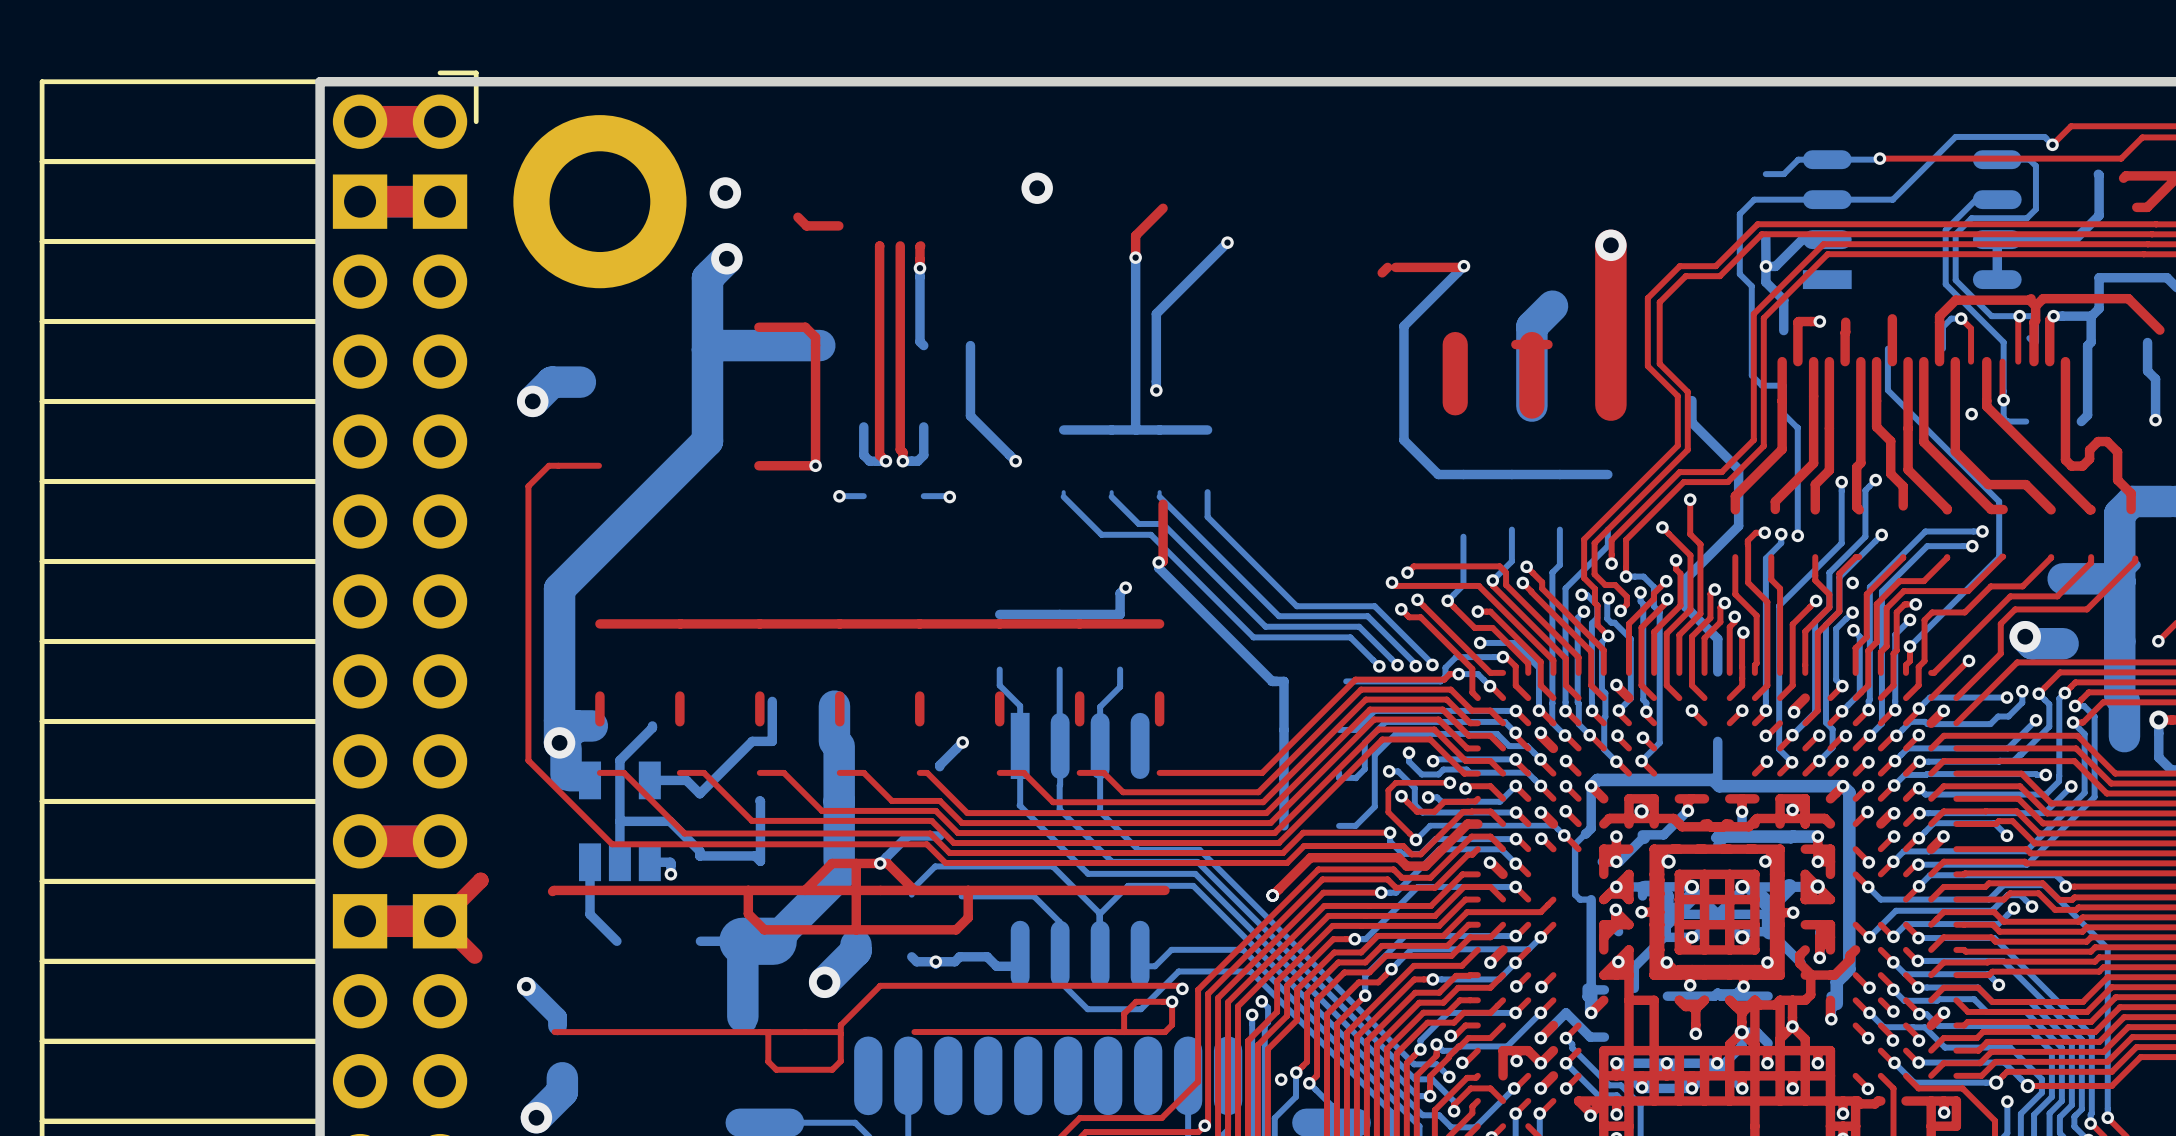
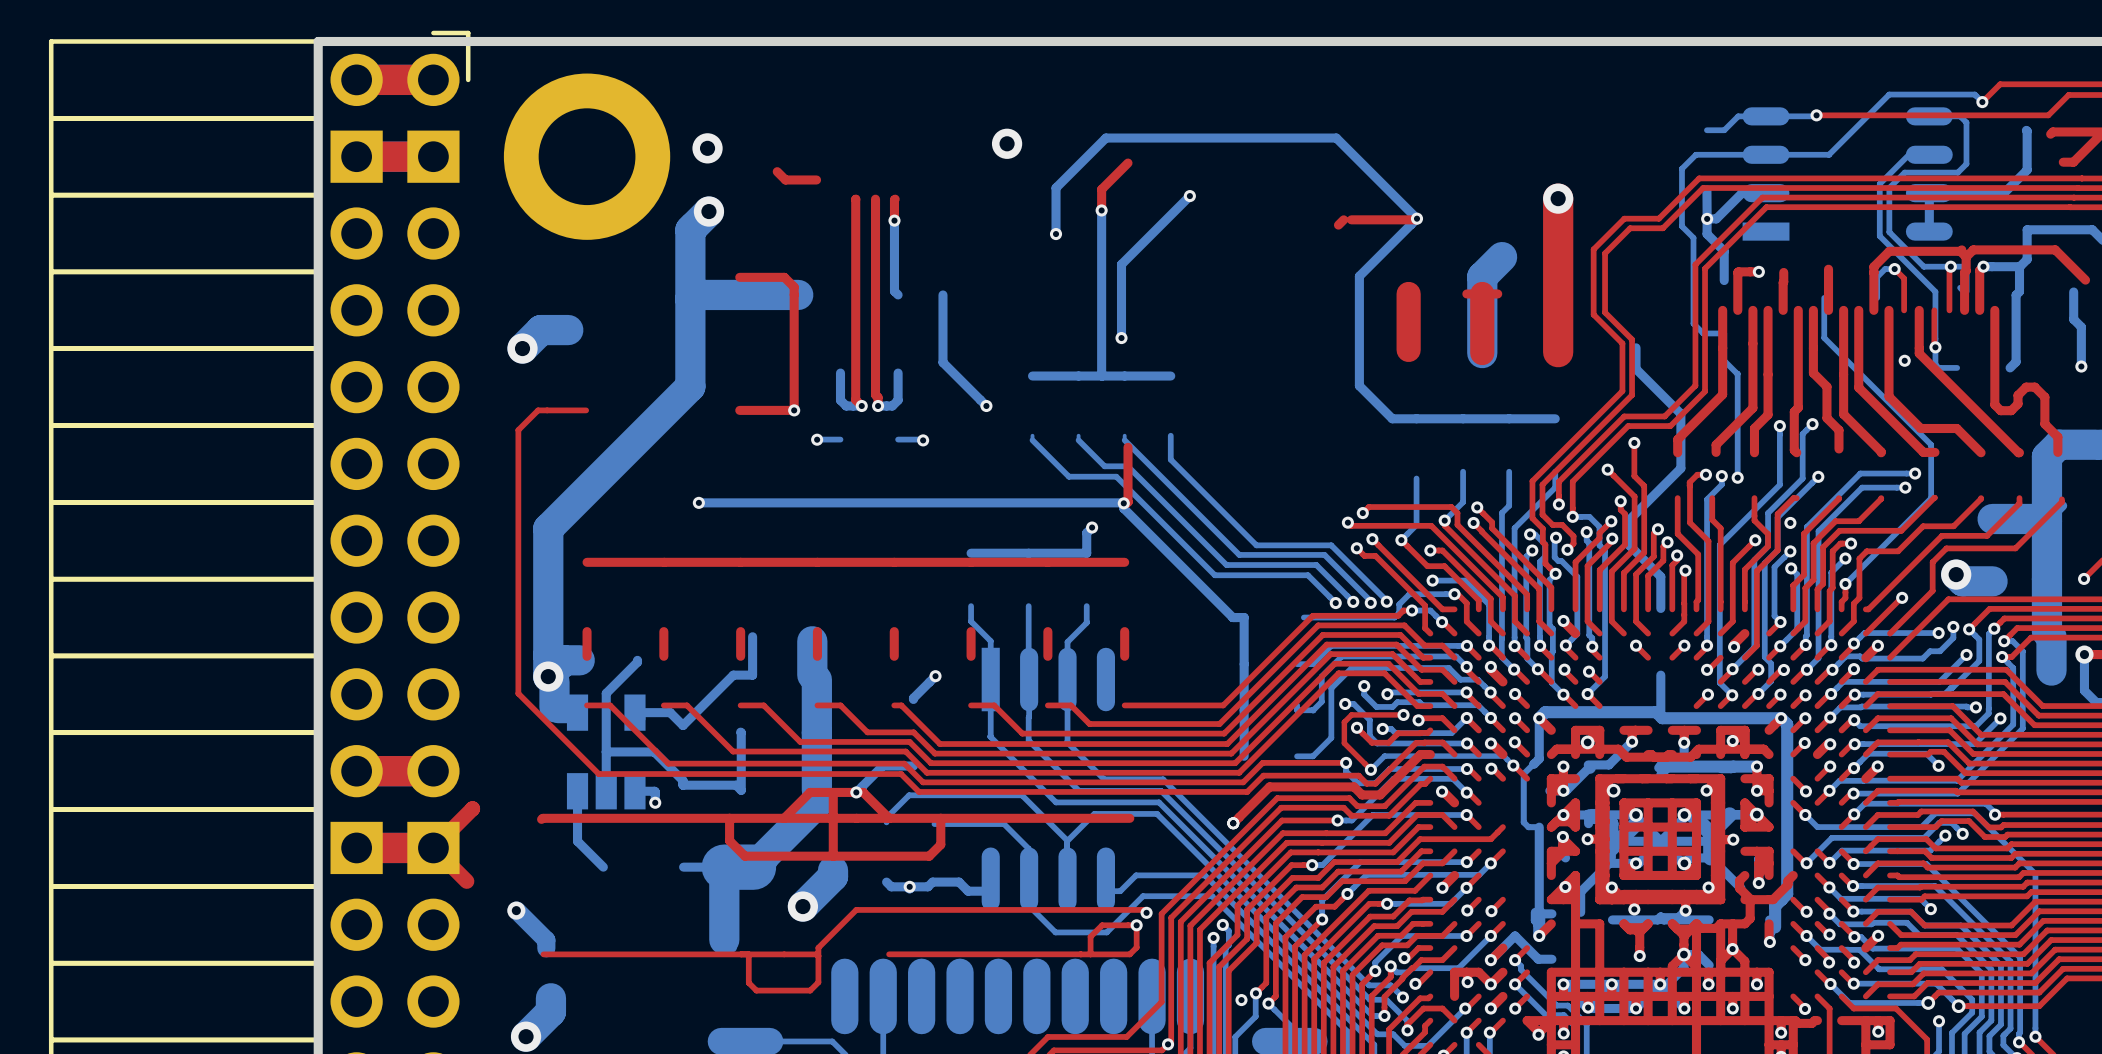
bottom track: none -> (1417, 218) (1336, 138) (1105, 138) (1056, 187) (1056, 234)
via: none -> (1056, 234)
bottom track: none -> (698, 502) (1123, 502)
via: none -> (698, 502)

